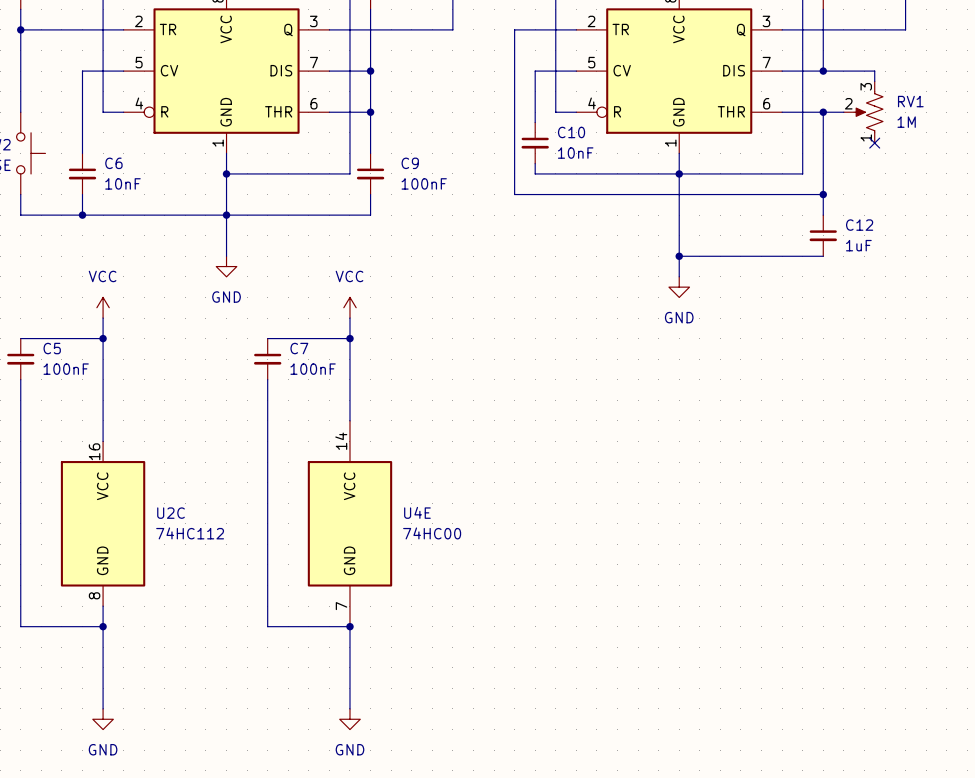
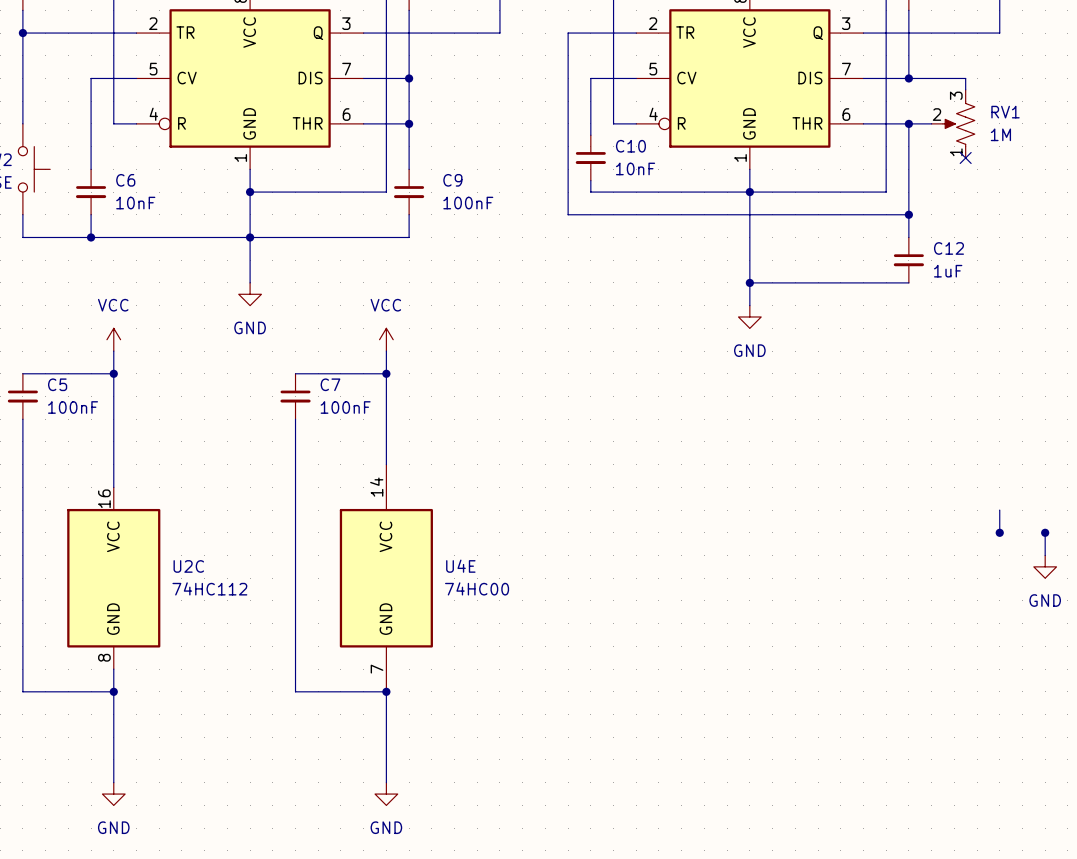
wire: none -> (999, 510) (999, 532)
junction: none -> (999, 532)
wire: none -> (1045, 532) (1045, 555)
junction: none -> (1045, 532)
power symbol: none -> GND (1045, 566)

